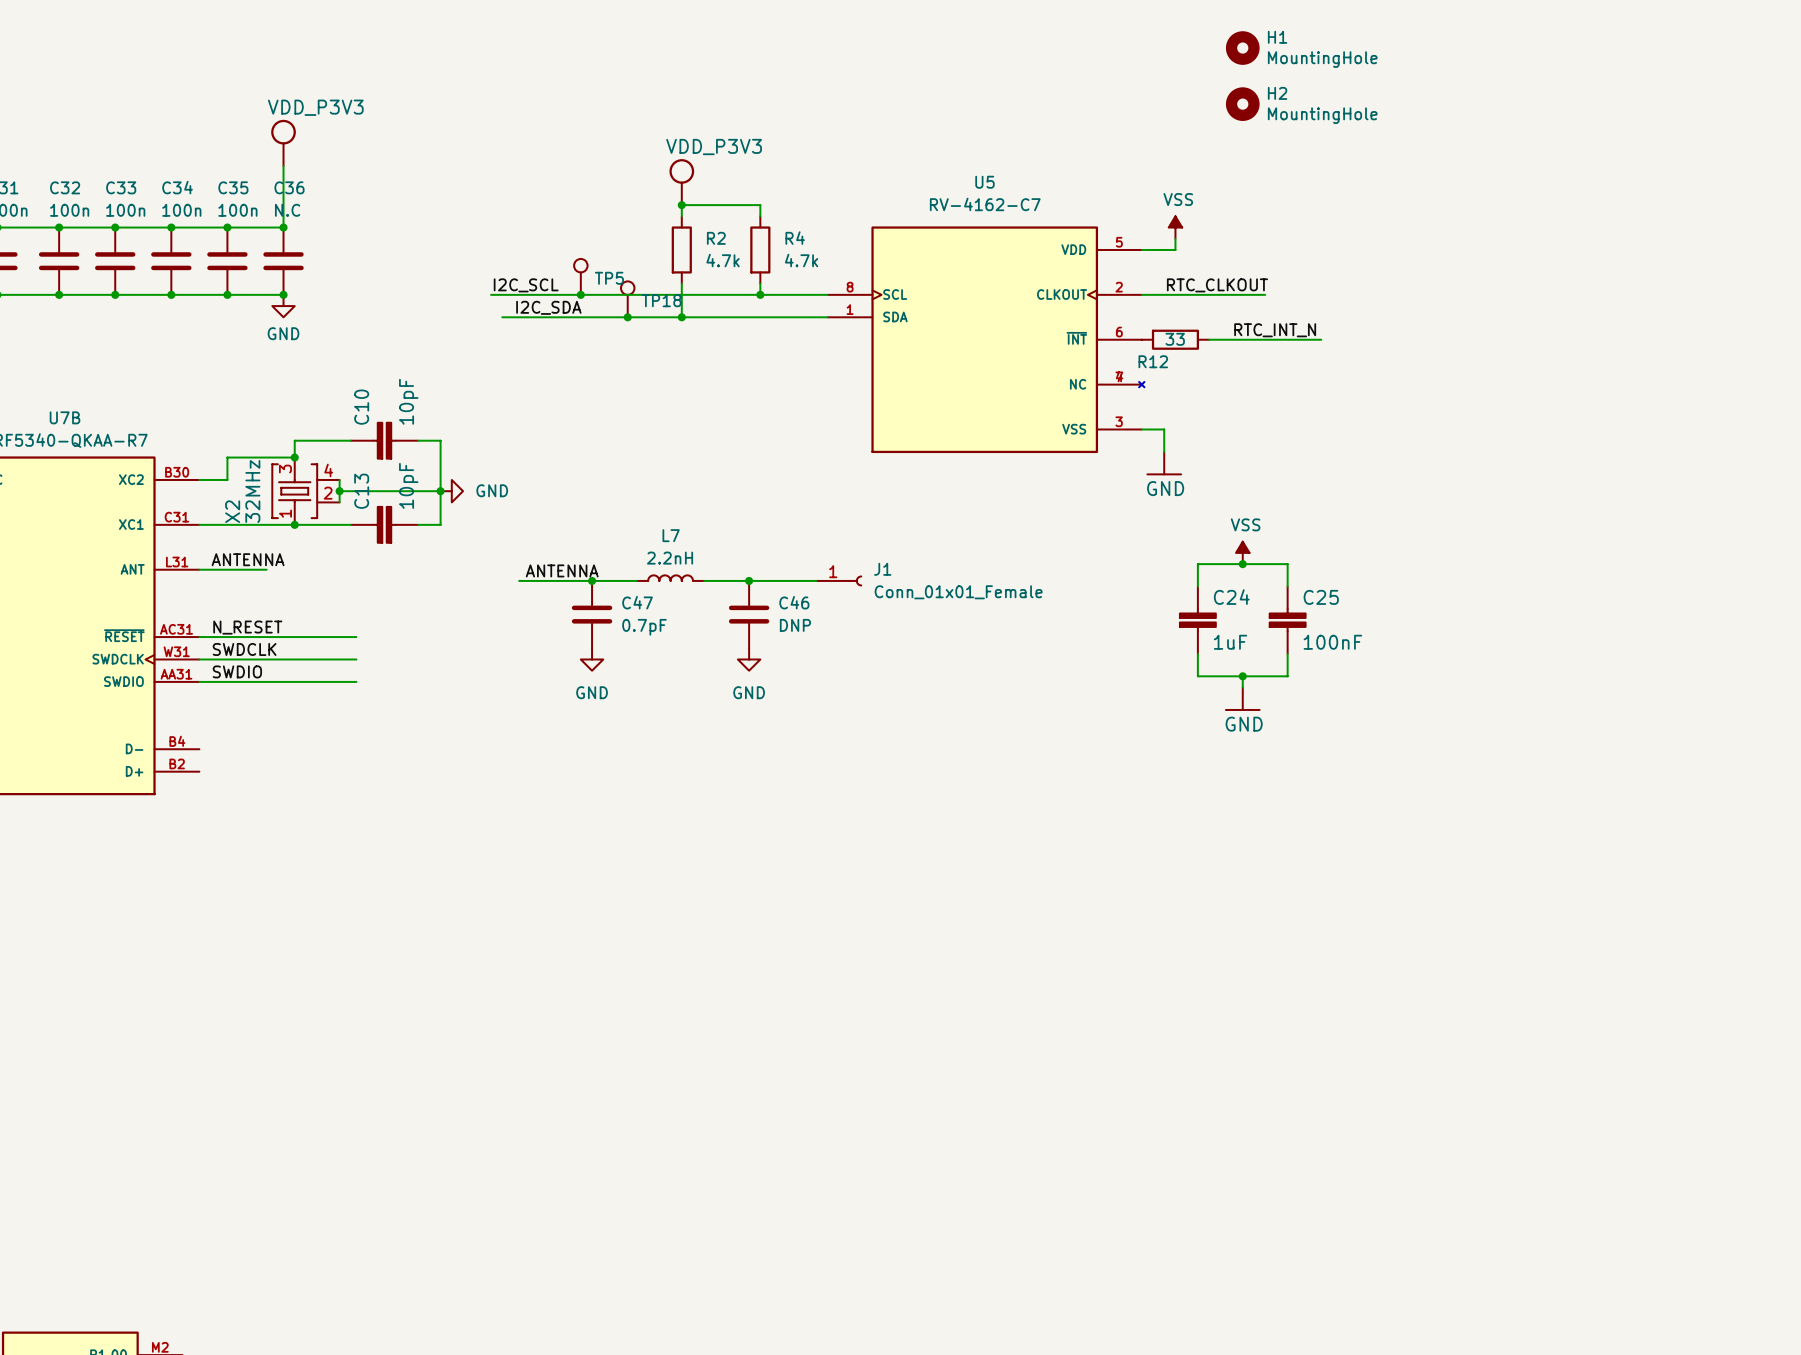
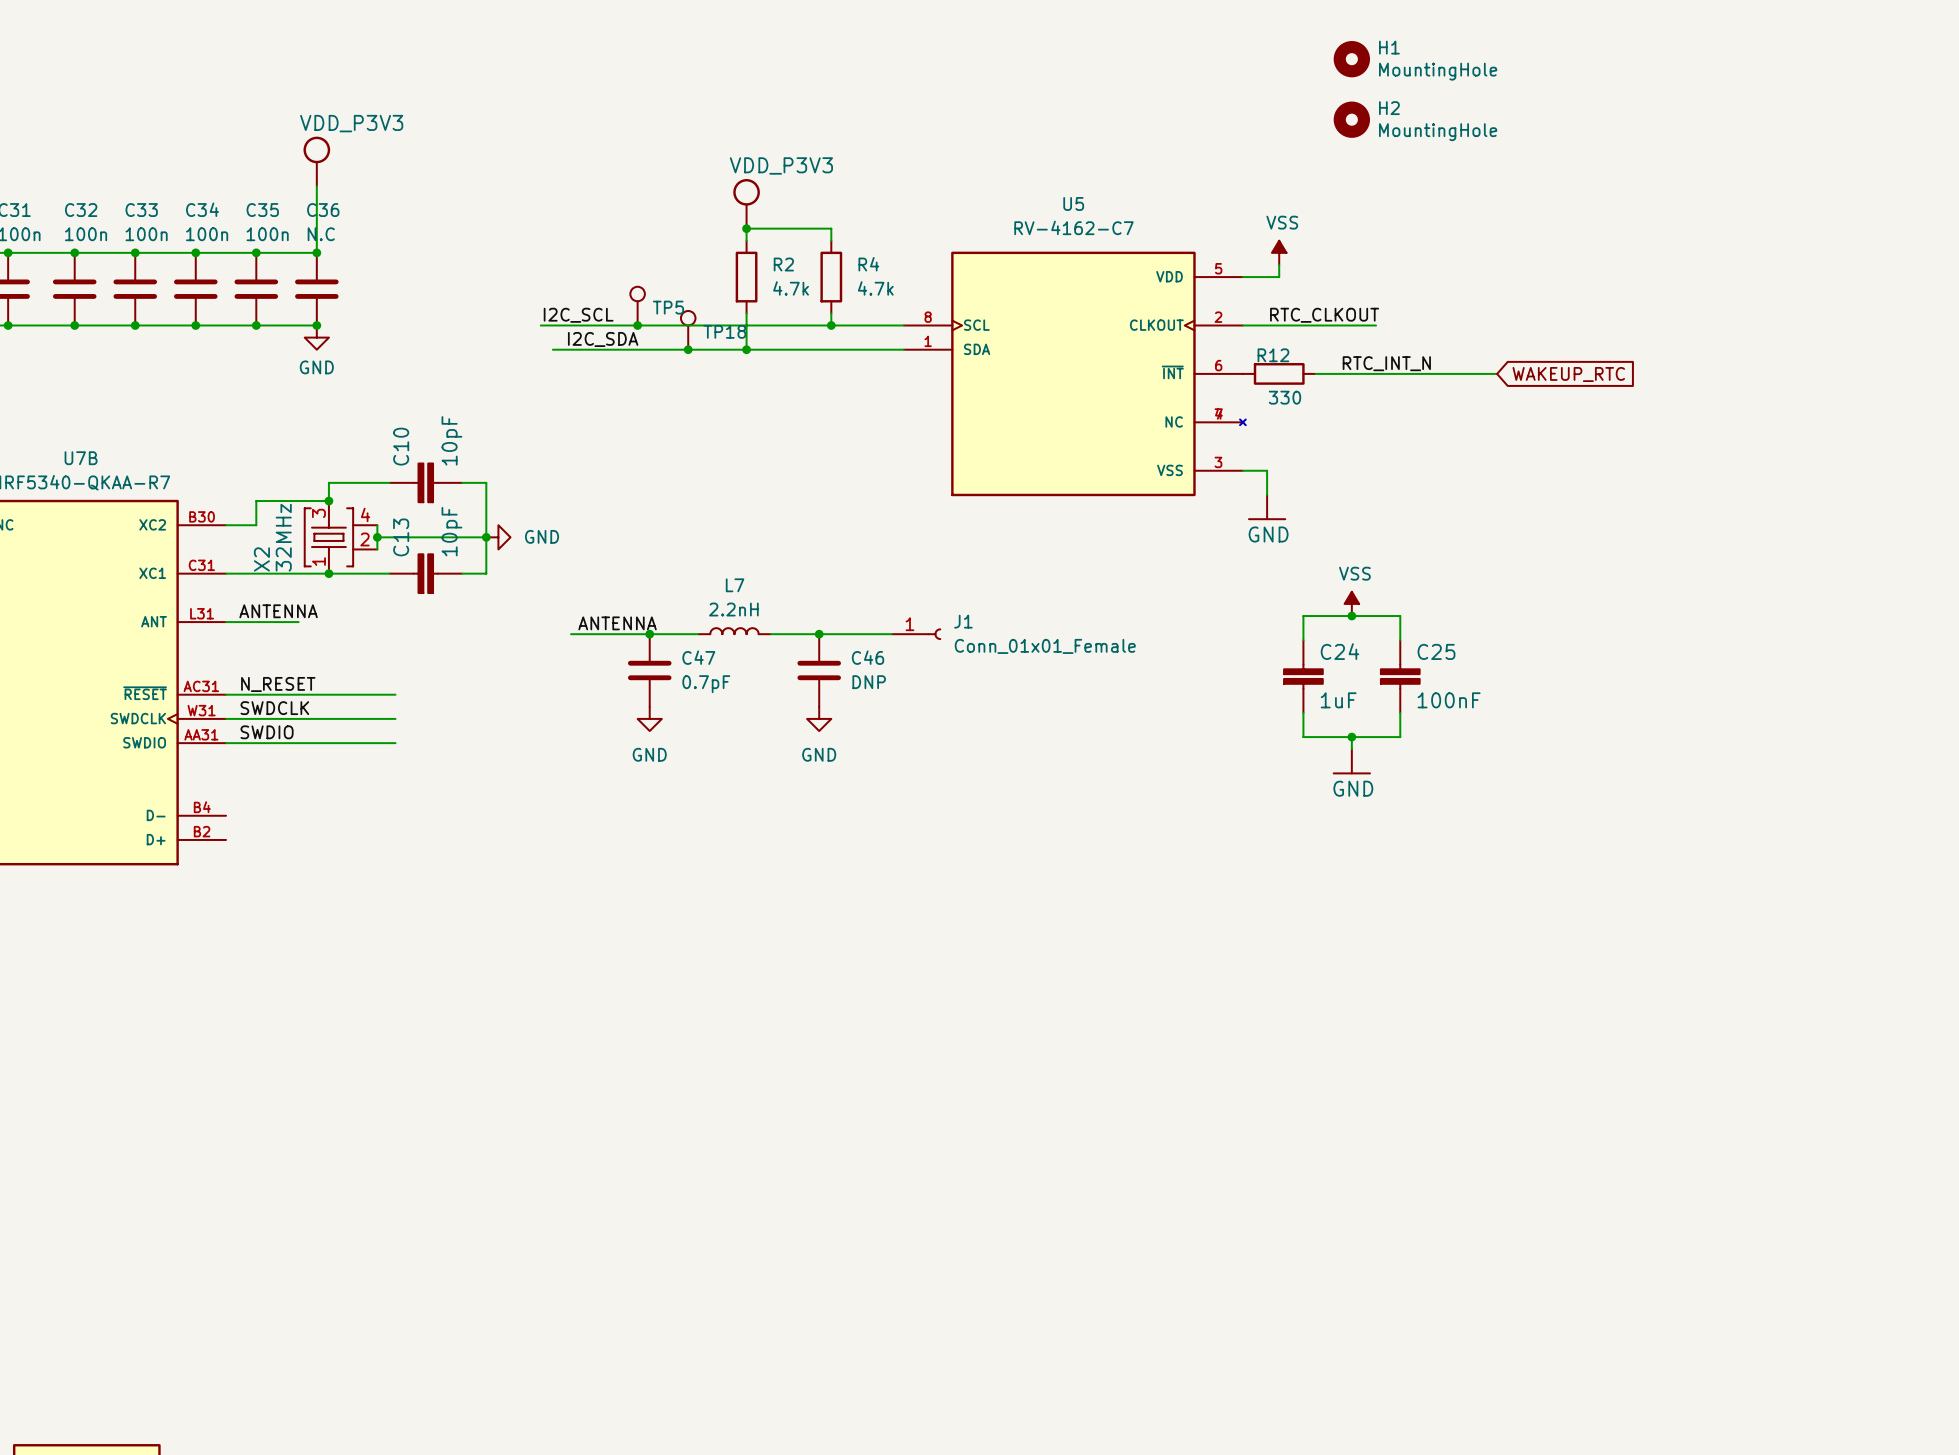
R12 value: 33 (1175, 339) -> 330 (1284, 397)
wire: none -> (1436, 373) (1497, 373)
global label: none -> WAKEUP_RTC (1568, 374)
R12 name position: R12 (1153, 361) -> R12 (1273, 355)

